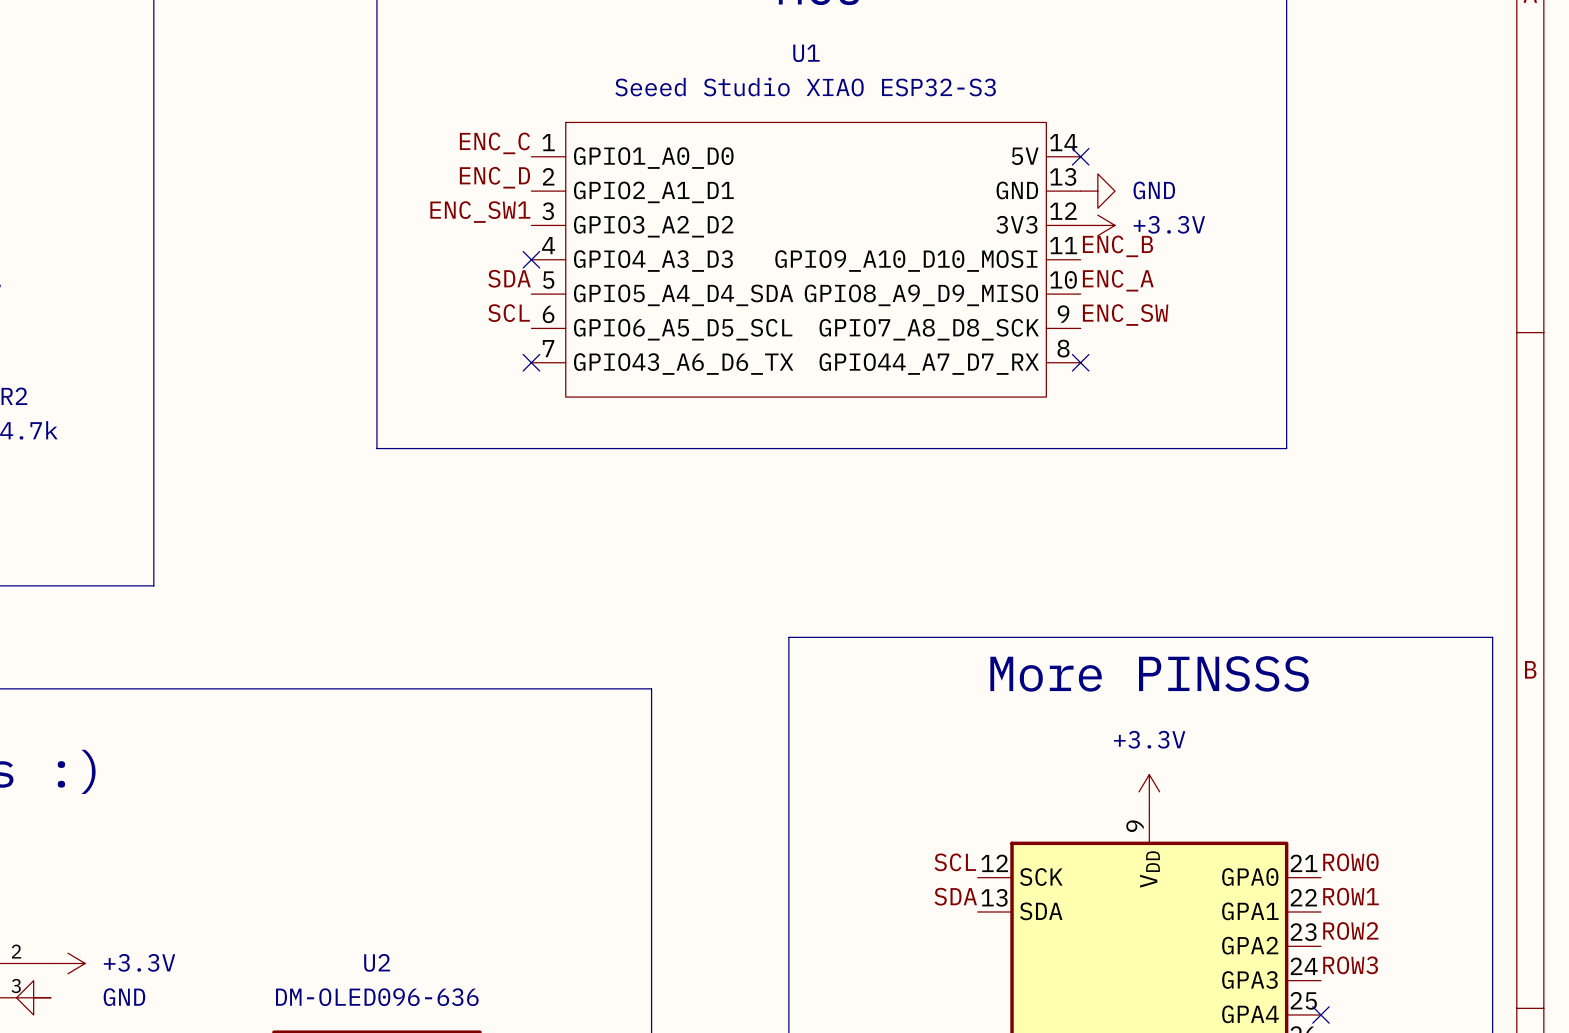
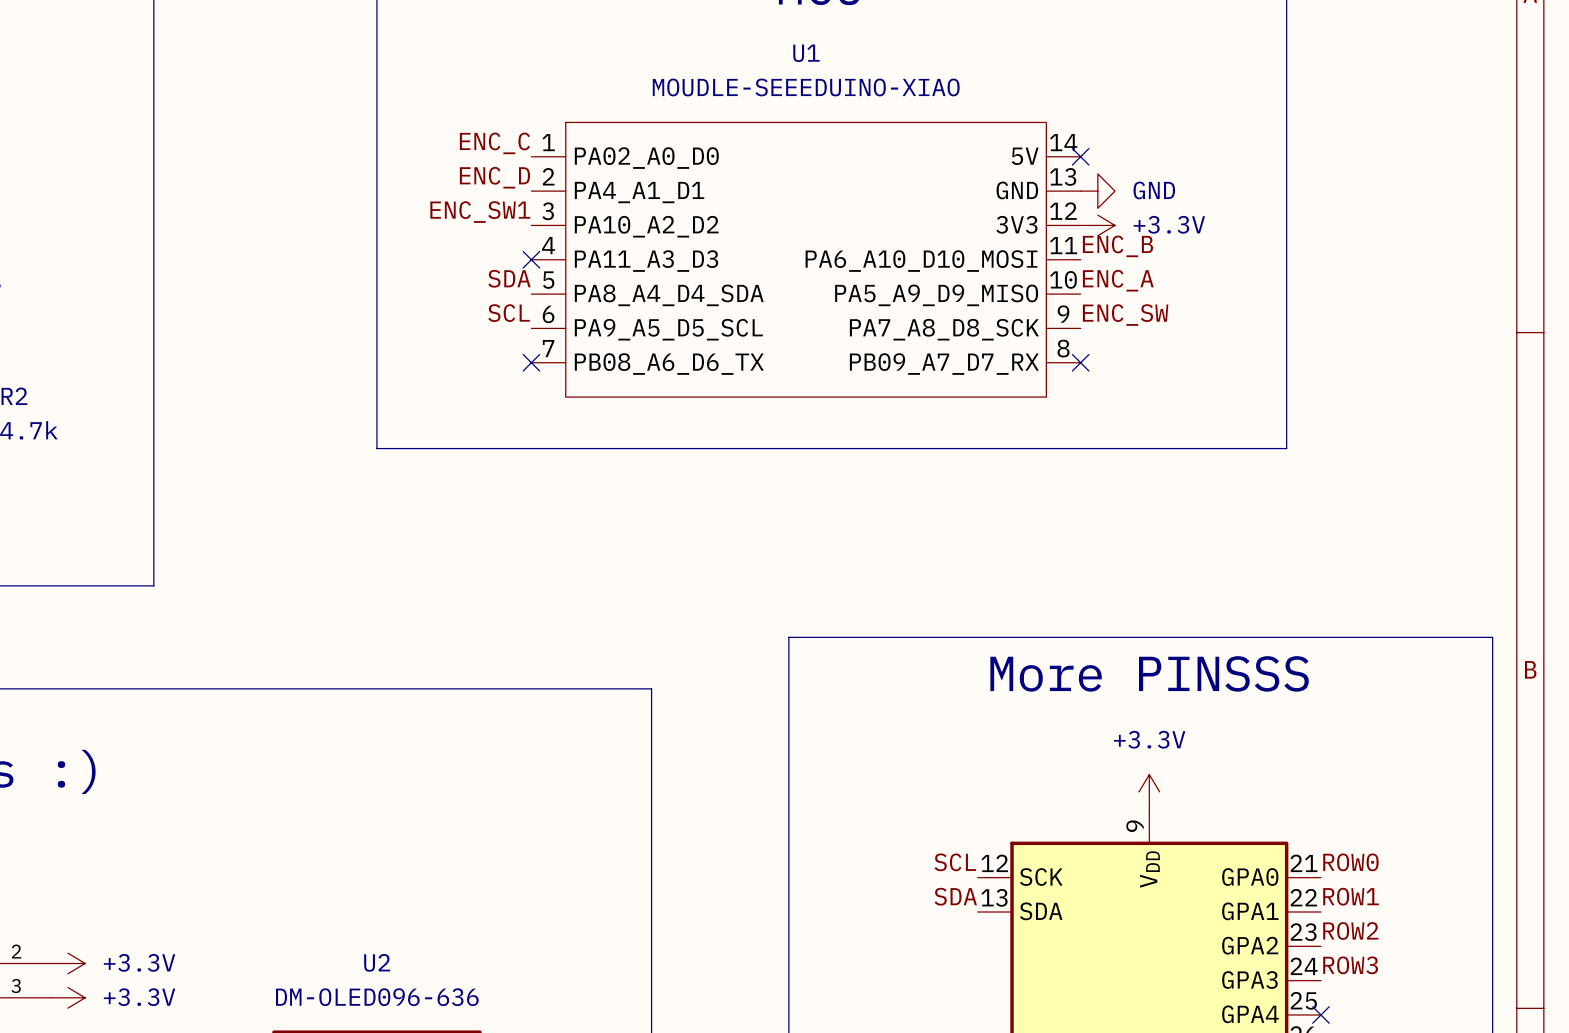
U1 value: Seeed Studio XIAO ESP32-S3 (805, 87) -> MOUDLE-SEEEDUINO-XIAO (806, 87)
U1 symbol: [531, 122, 1081, 398] -> [531, 122, 1081, 398]
power symbol: GND (33, 997) -> none
power symbol: none -> +3.3V (67, 997)

